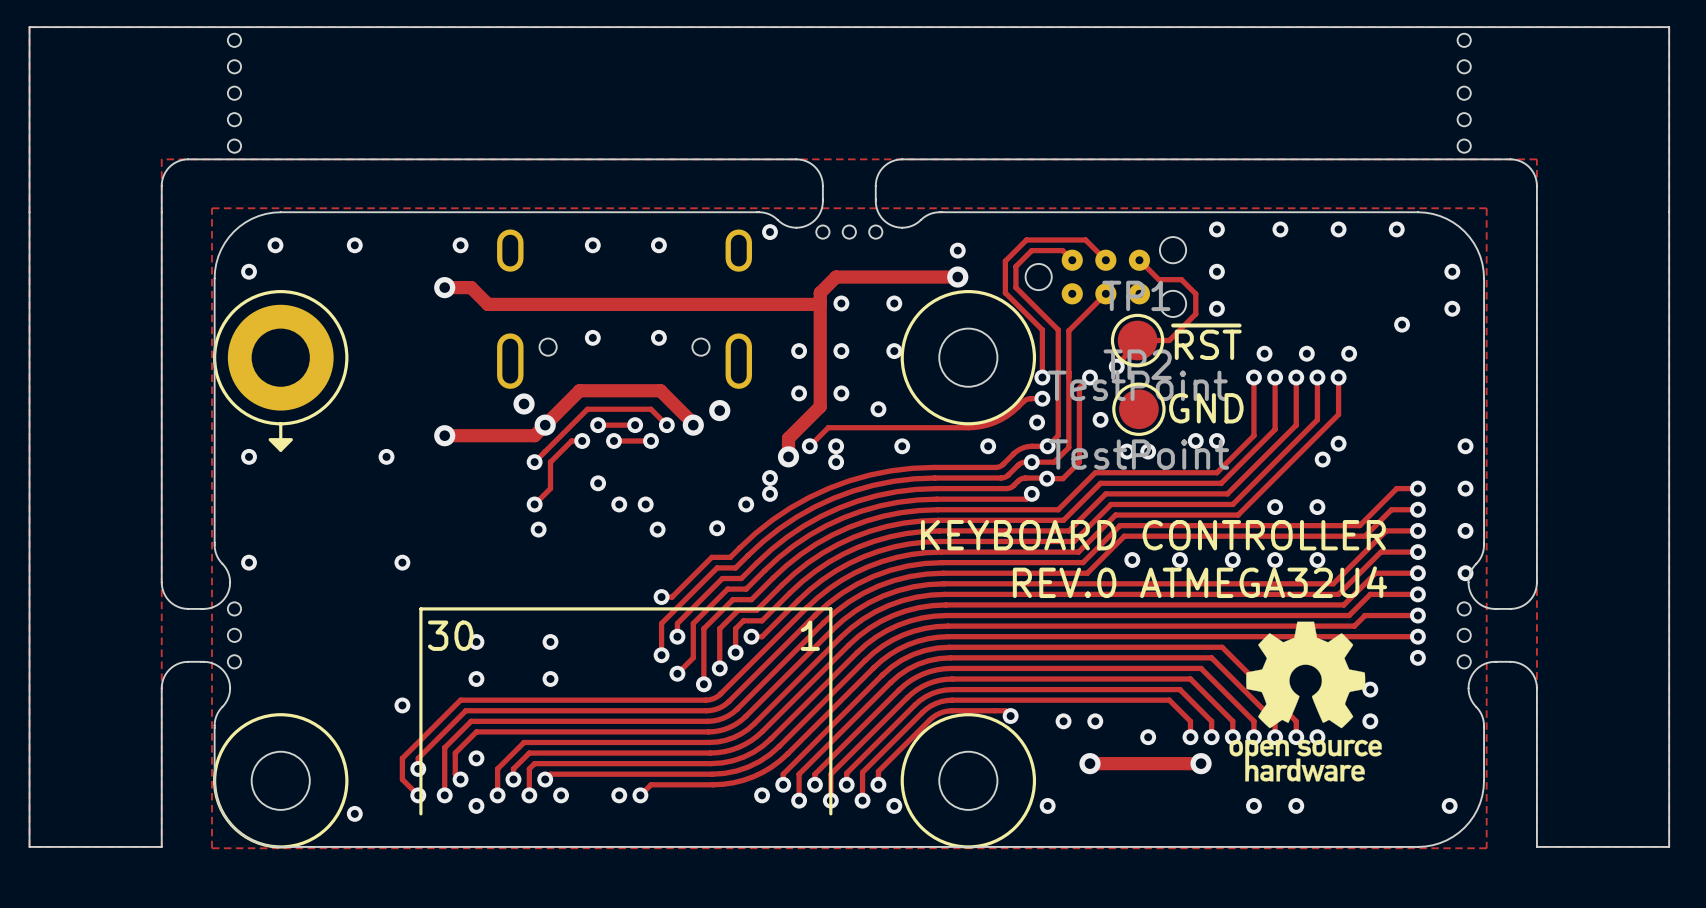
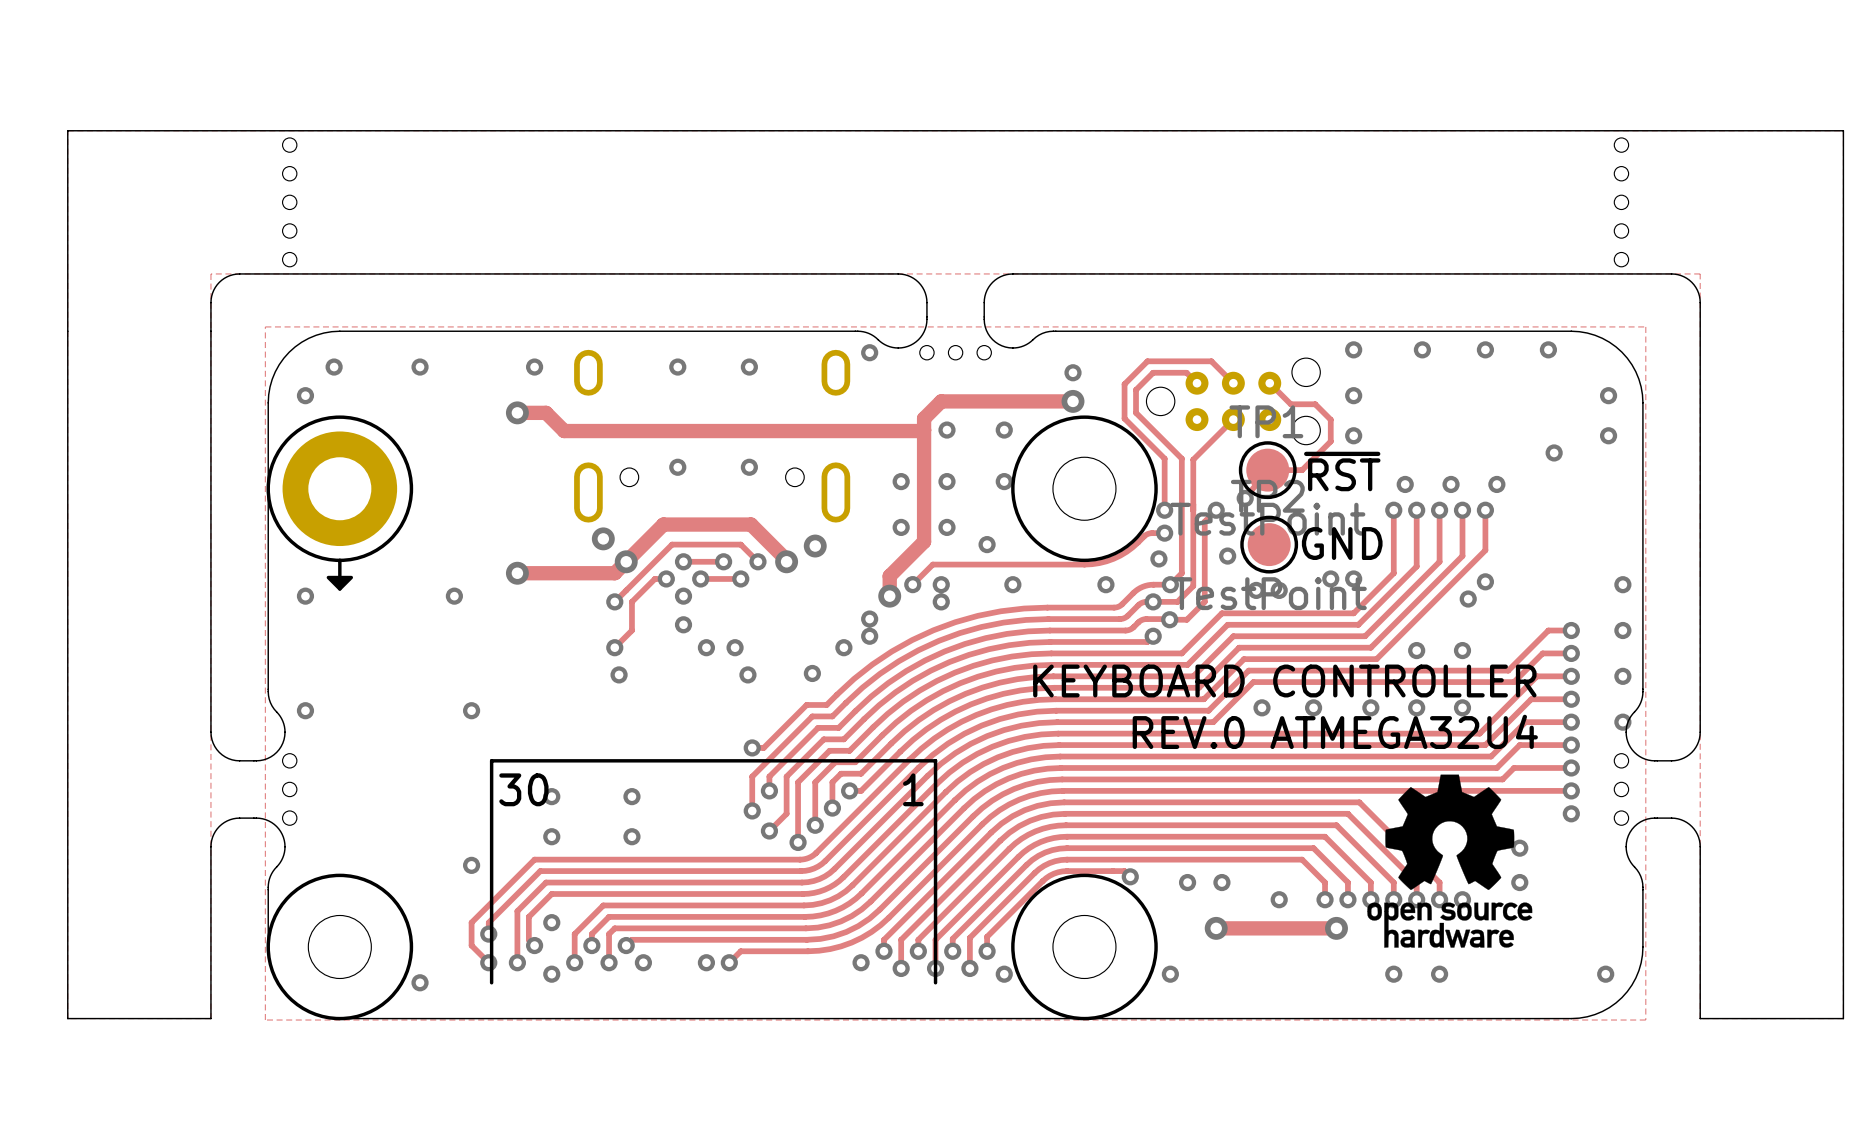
via: none -> (683, 596)

